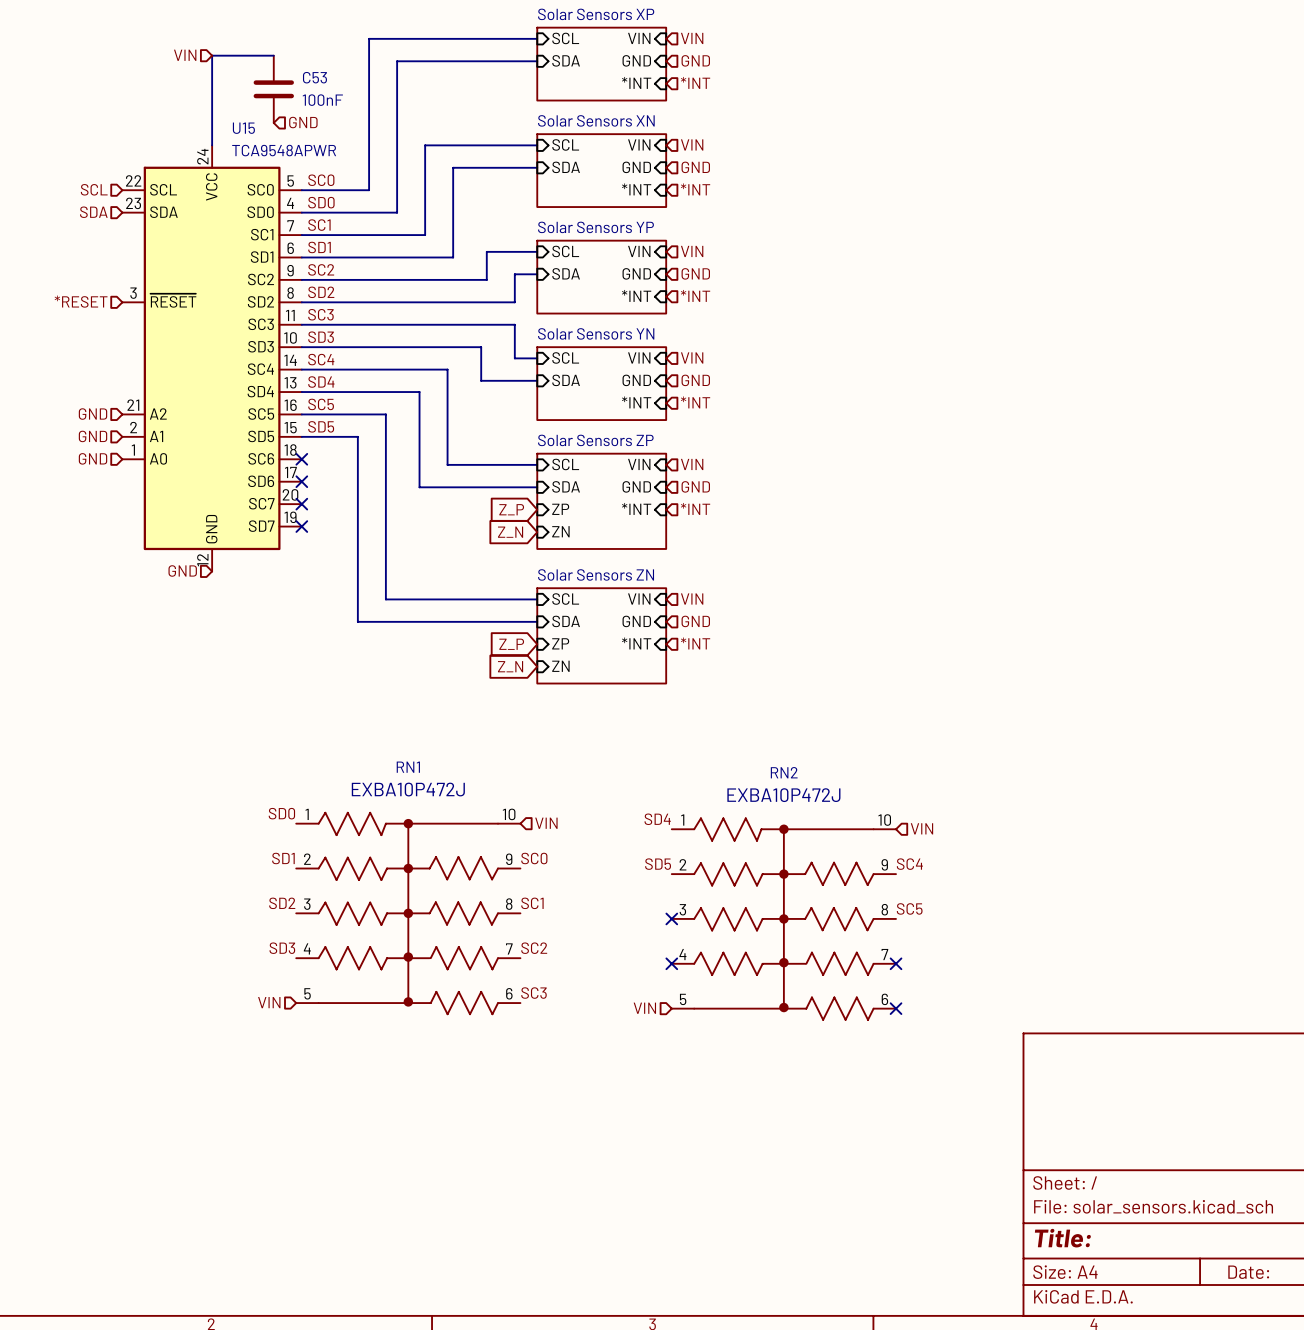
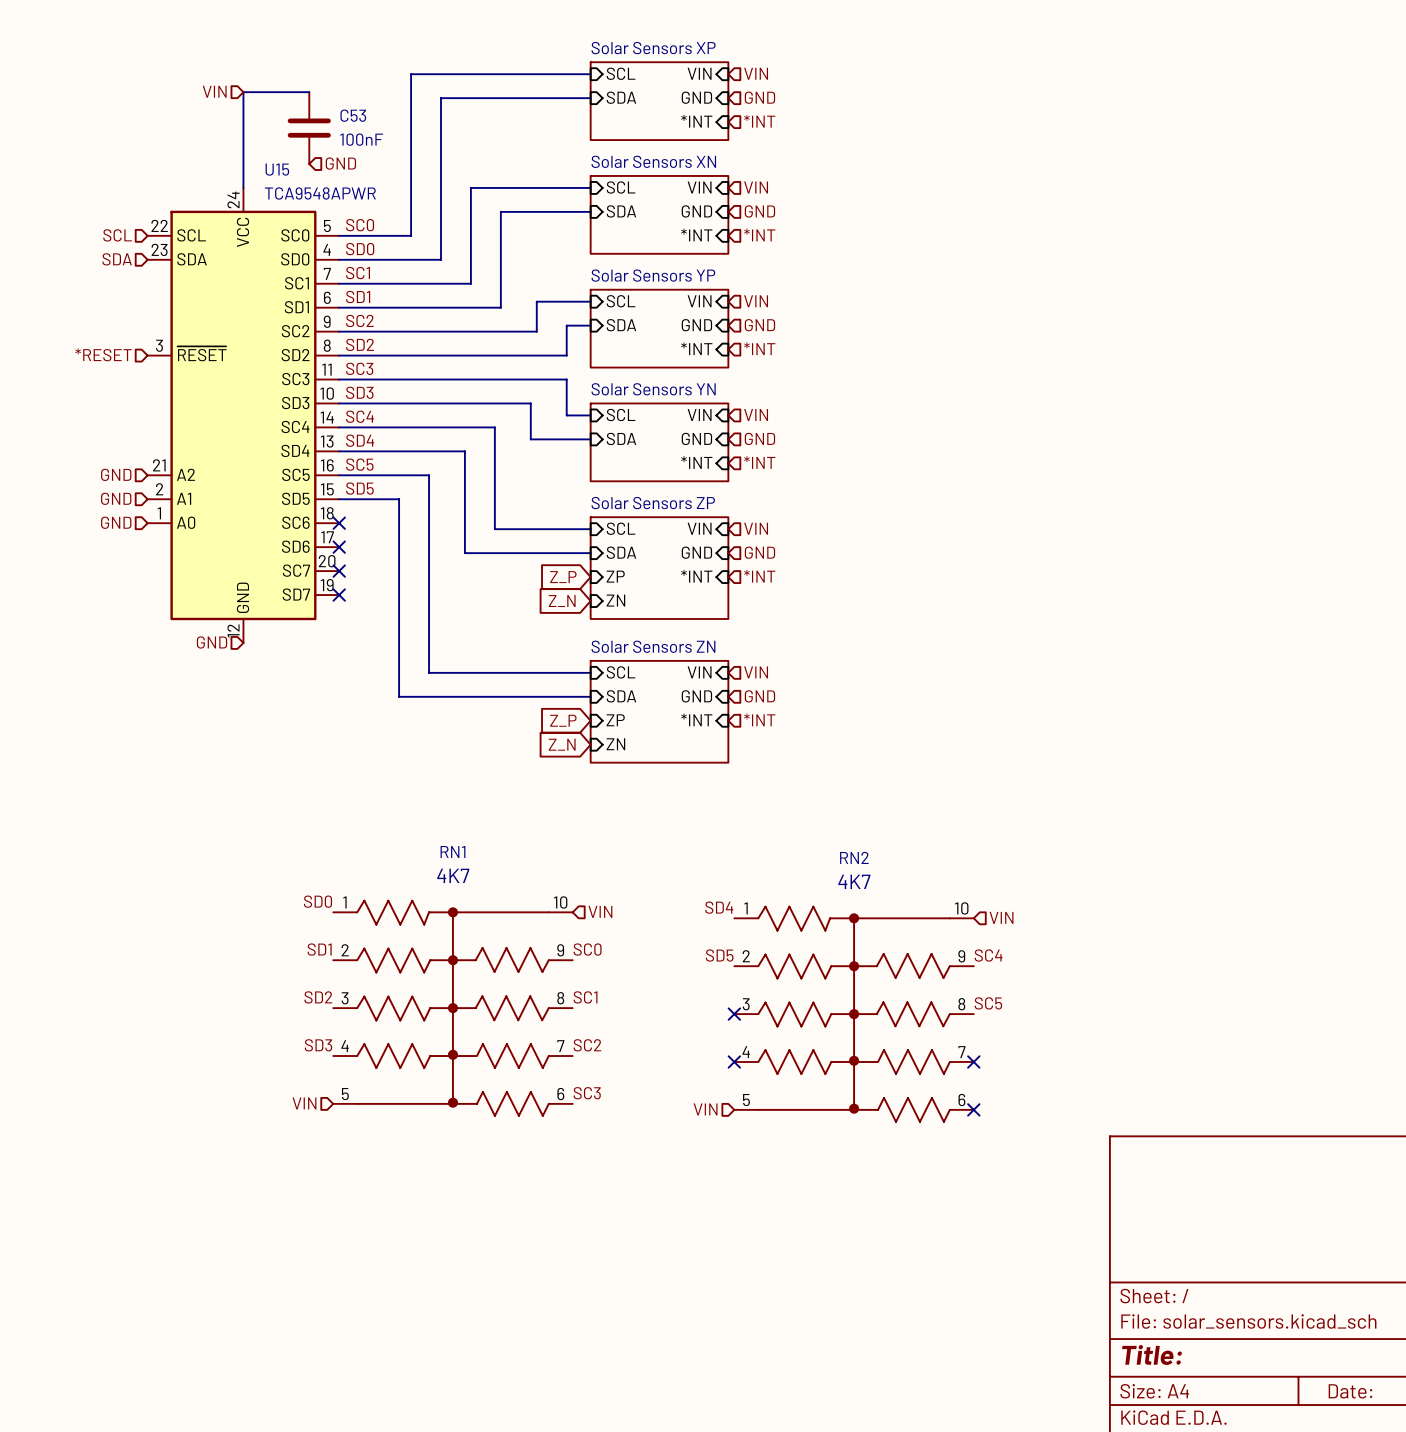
RN1 value: EXBA10P472J (408, 789) -> 4K7 (453, 875)
RN2 value: EXBA10P472J (783, 795) -> 4K7 (854, 881)

